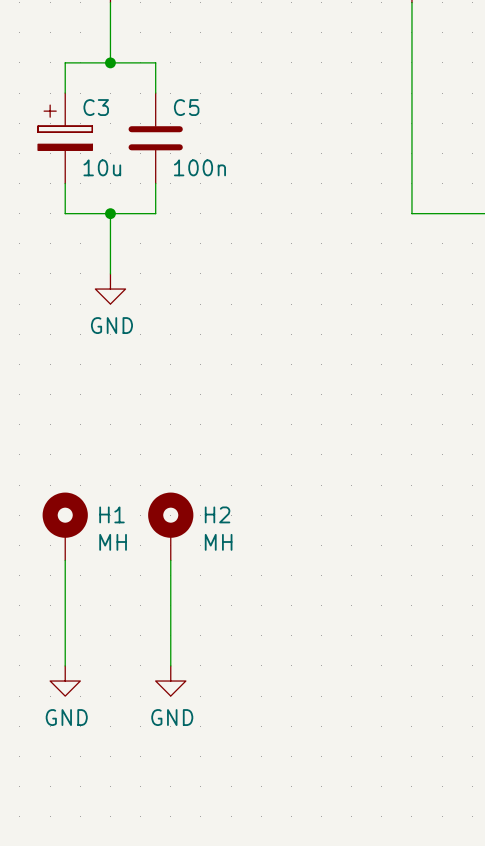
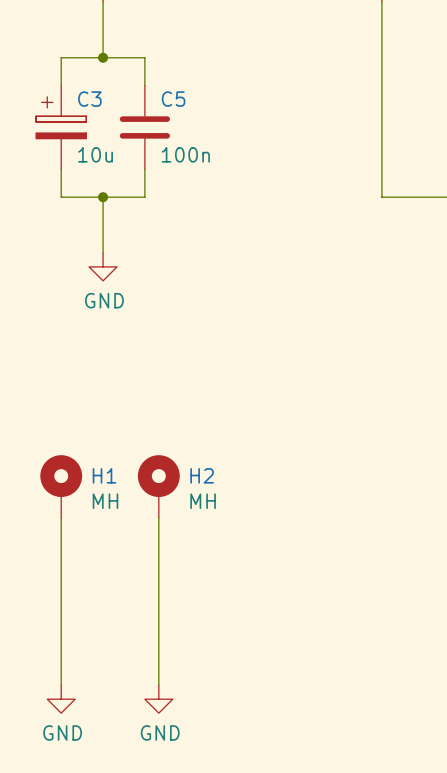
wire: none -> (61, 615) (61, 685)
wire: none -> (158, 615) (158, 685)
power symbol: GND (65, 681) -> none
power symbol: GND (170, 681) -> none
power symbol: none -> GND (61, 699)
power symbol: none -> GND (158, 699)

